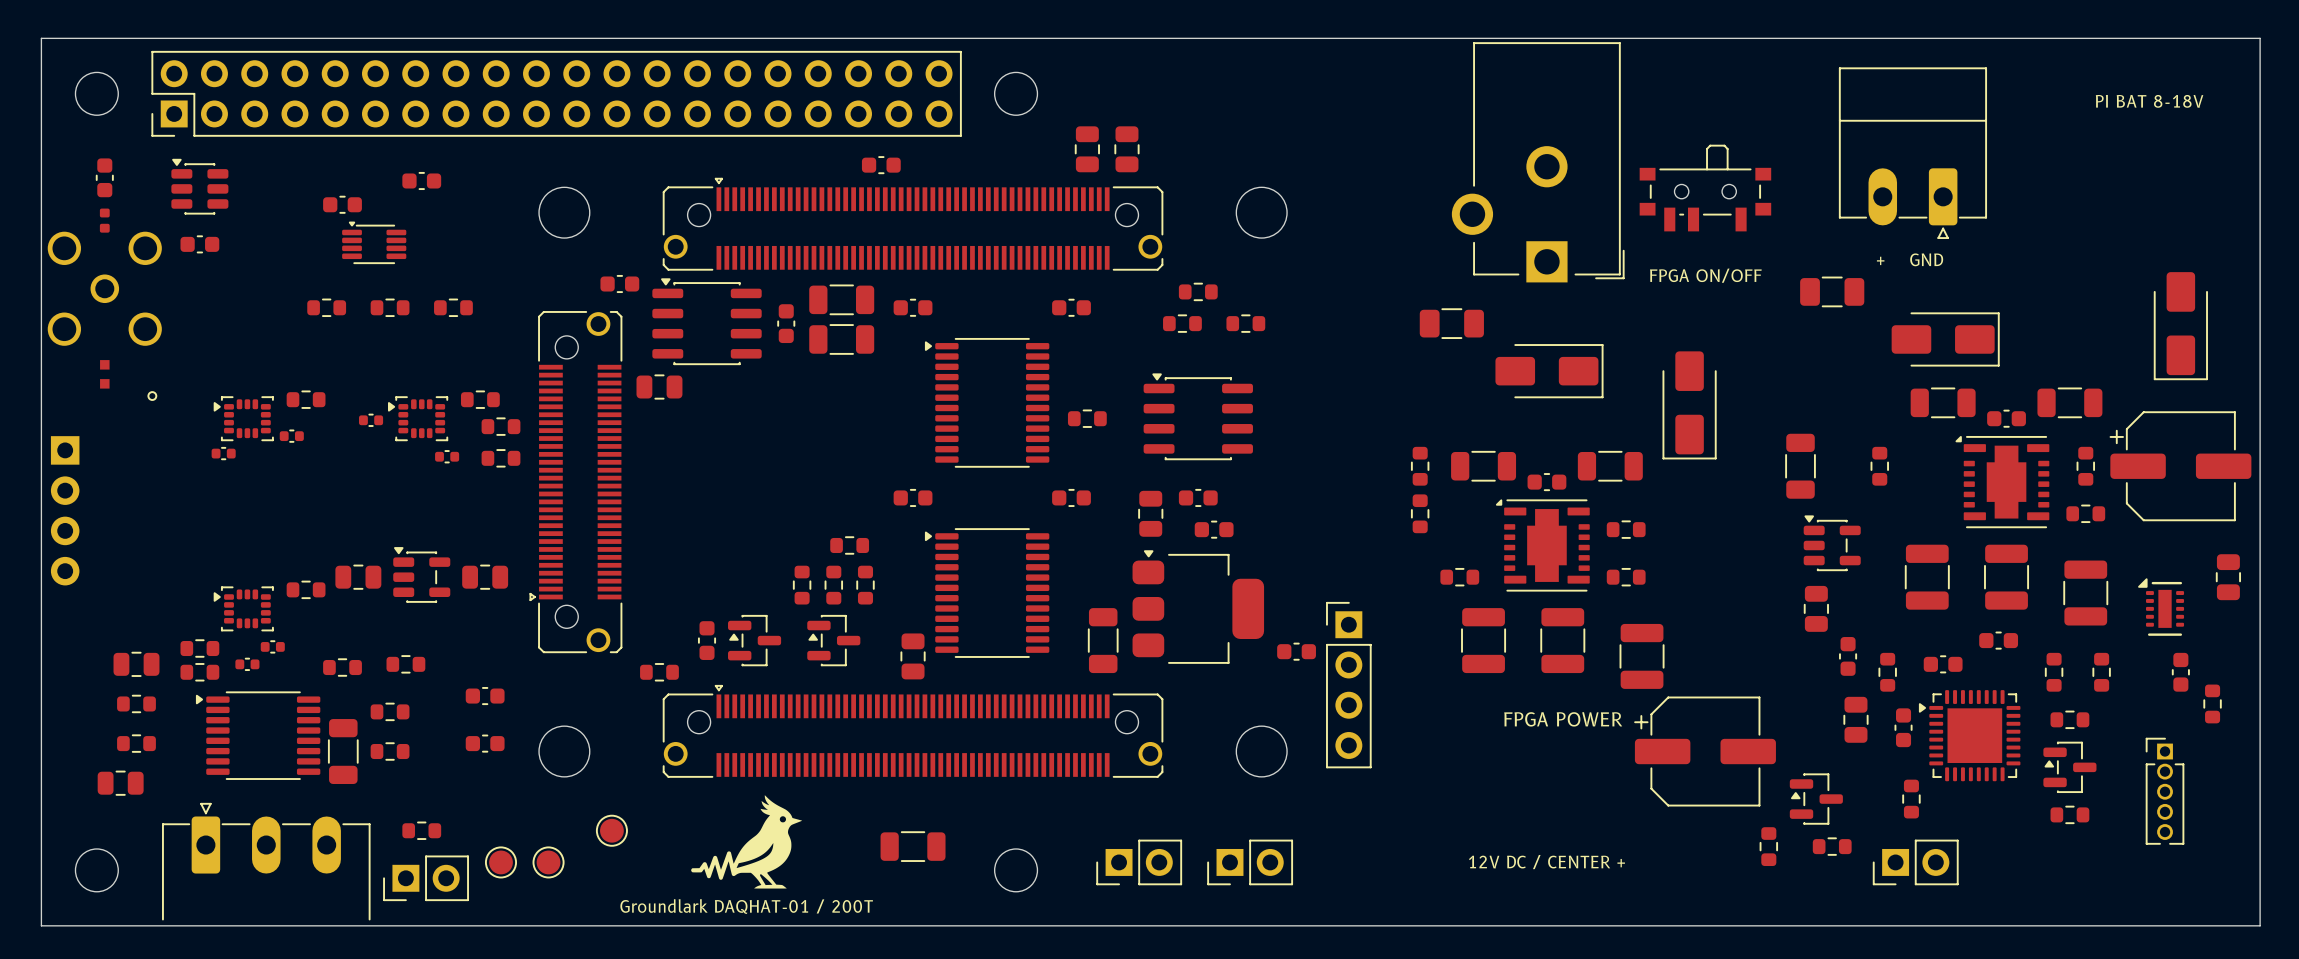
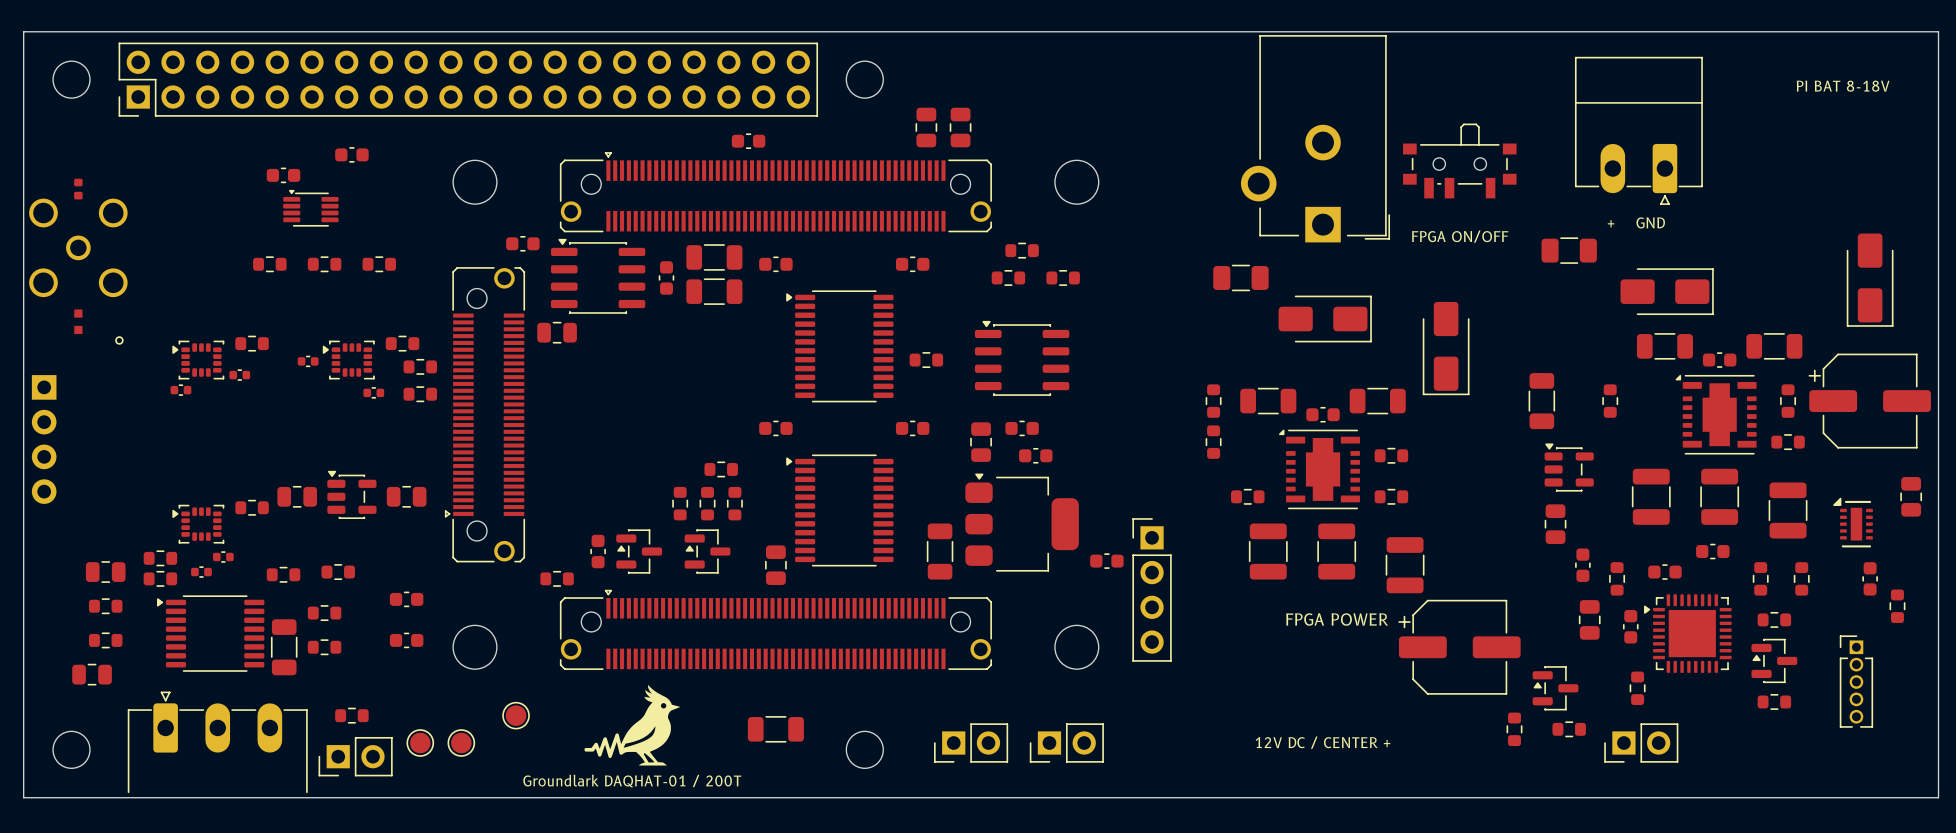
part: (104, 177) -> none
part: (199, 186) -> none
part: (199, 244) -> none

